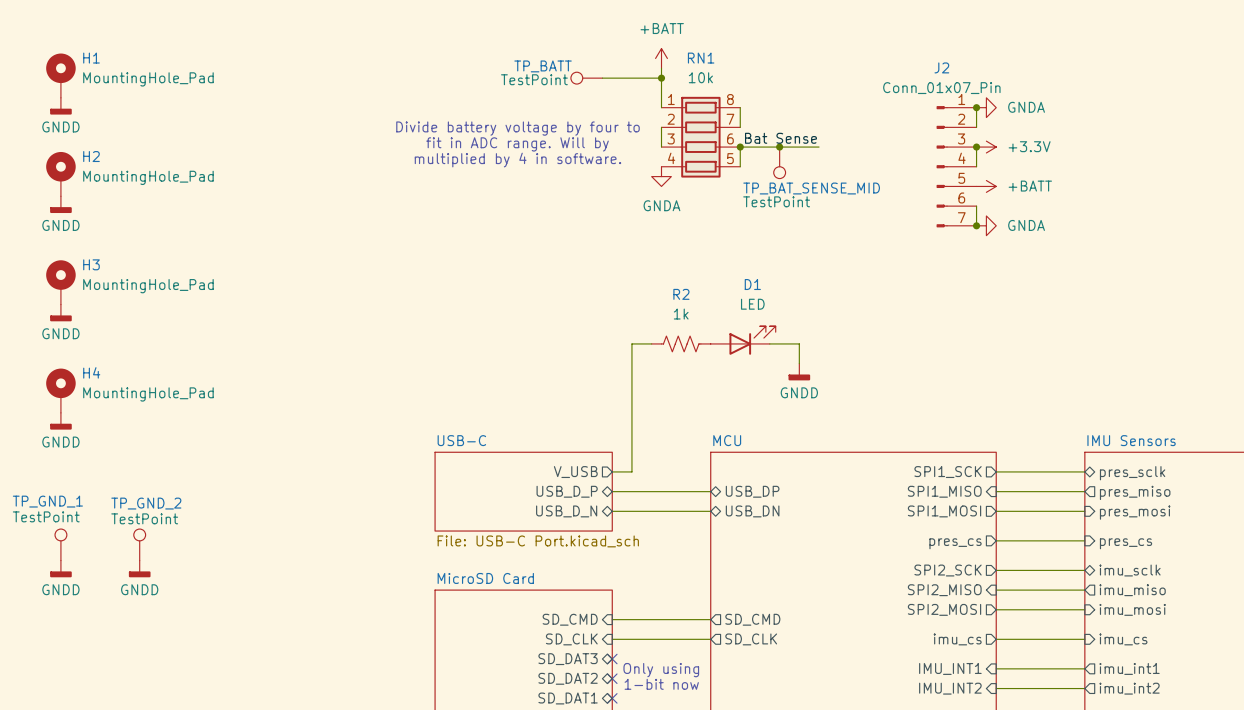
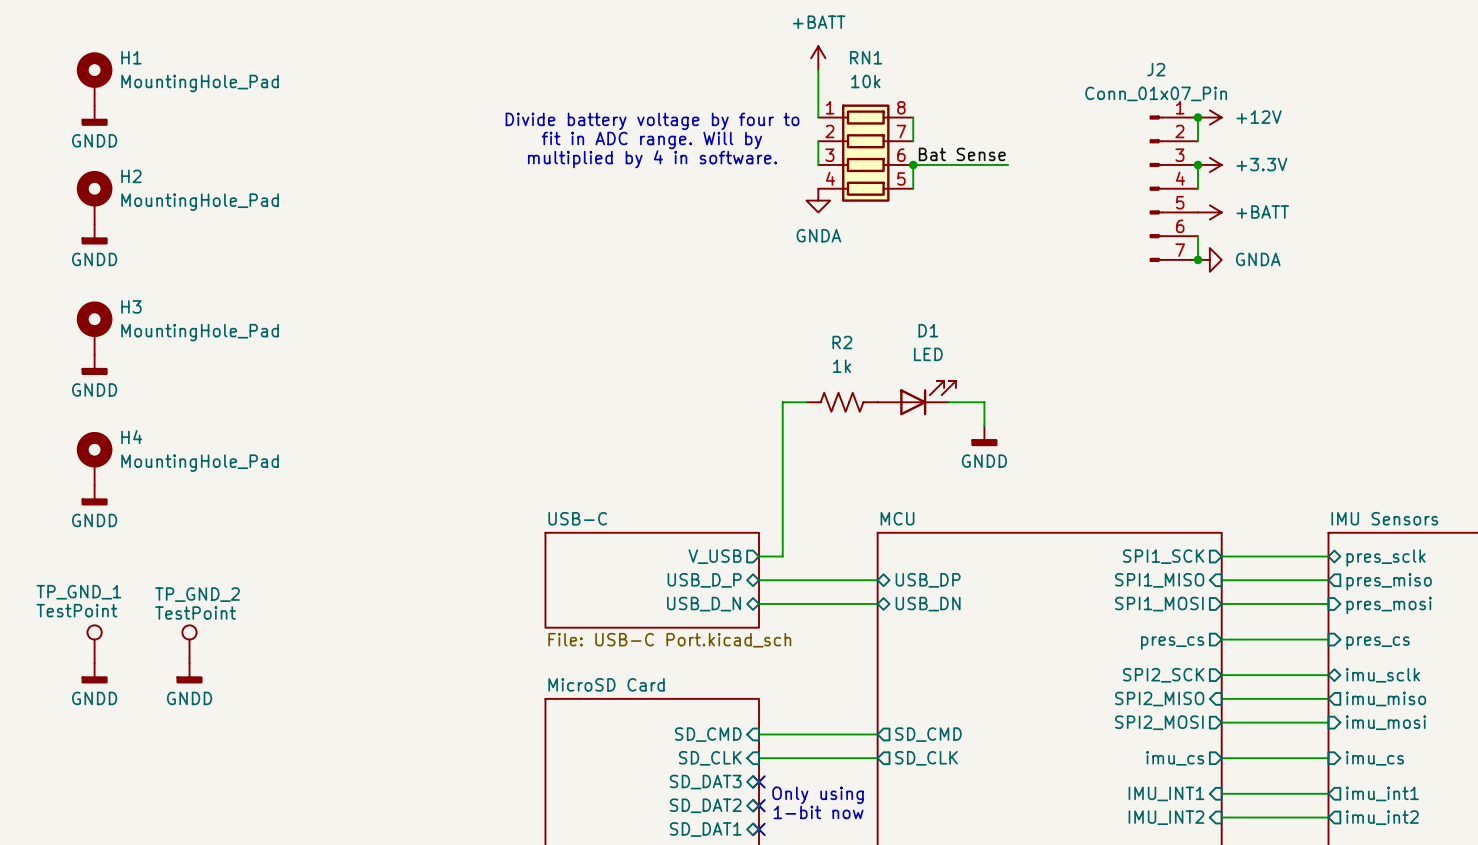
TP_BATT: TestPoint (586, 78) -> none
wire: (602, 78) (661, 78) -> none
junction: (661, 78) -> none
power symbol: GNDA (986, 107) -> +12V (1209, 117)
text: none -> Divide battery voltage by four to (652, 121)
text: Divide battery voltage by four to (517, 128) -> fit in ADC range. Will by (651, 140)
text: fit in ADC range. Will by (517, 144) -> multiplied by 4 in software. (652, 159)
junction: (779, 147) -> none
text: multiplied by 4 in software. (517, 160) -> none
TP_BAT_SENSE_MID: TestPoint (779, 162) -> none

